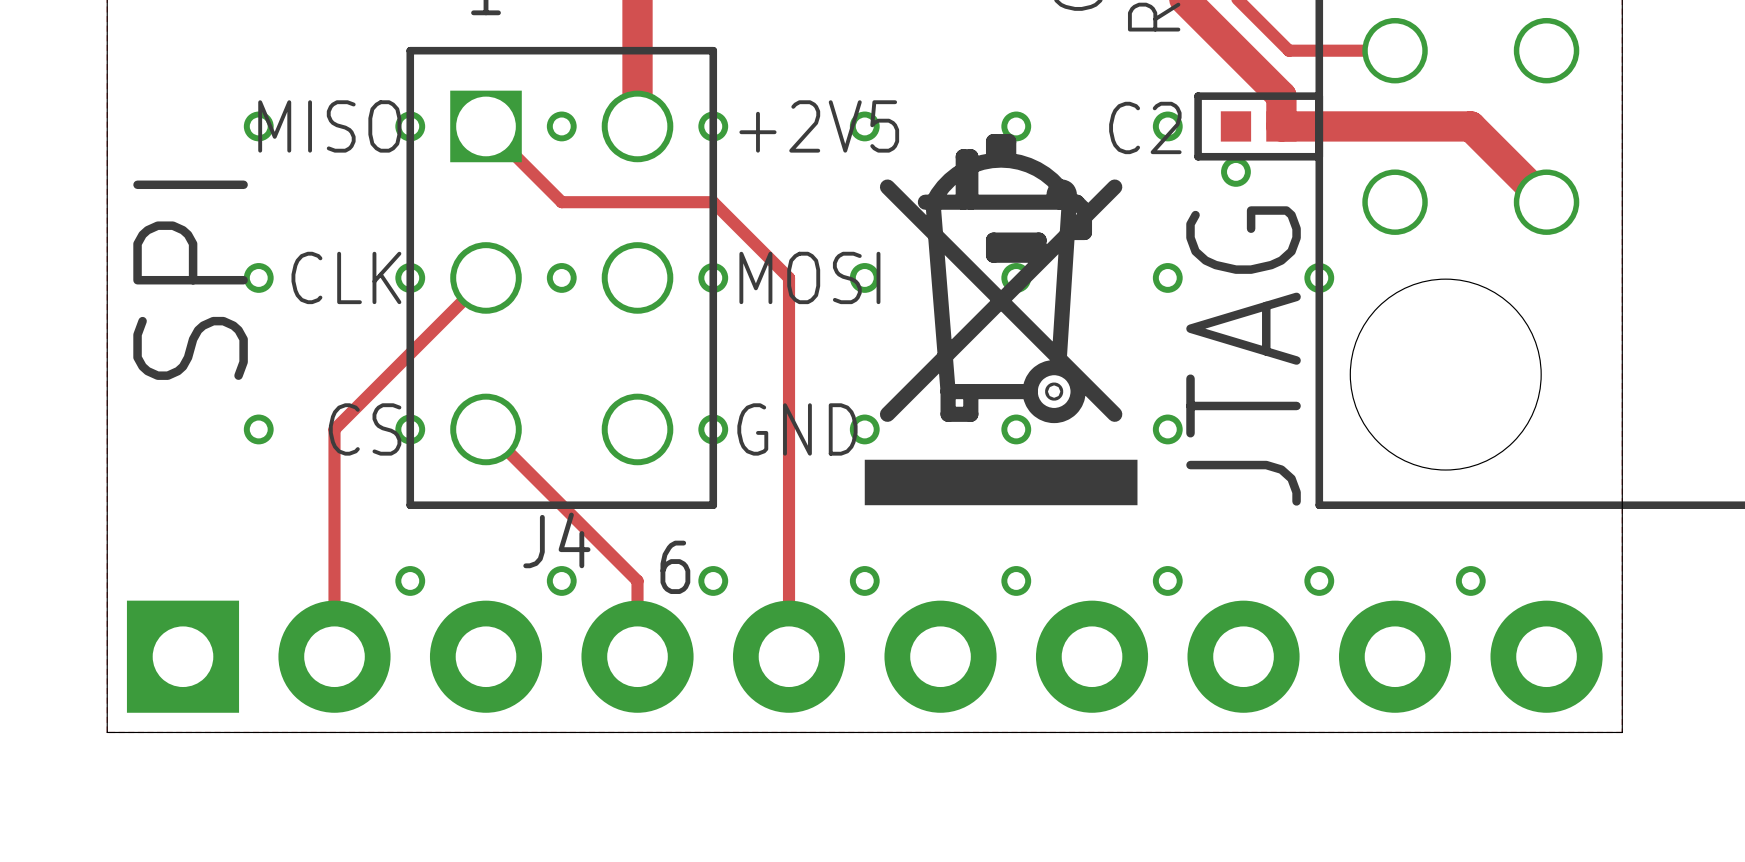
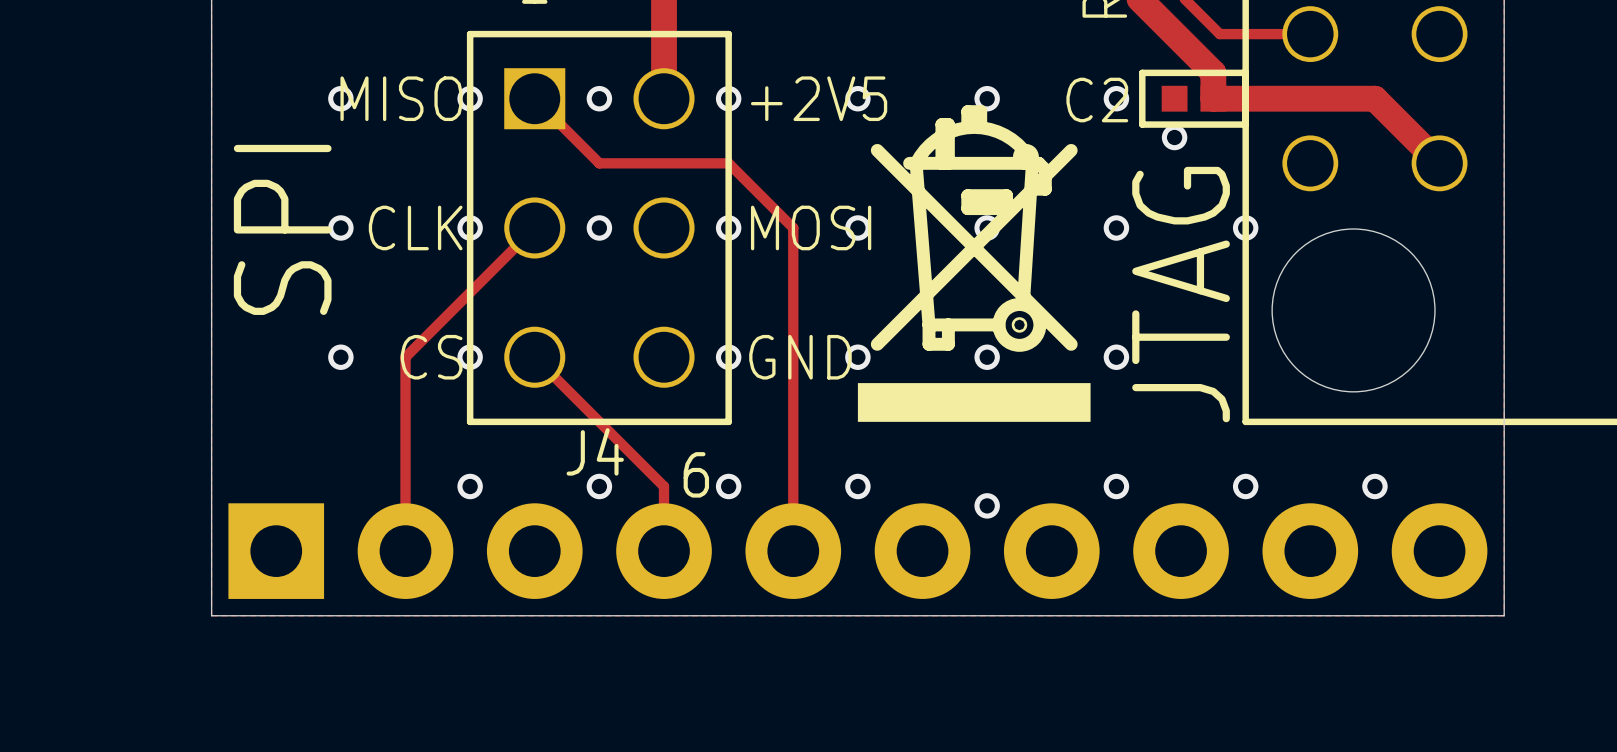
via position: (1016, 580) -> (987, 505)

